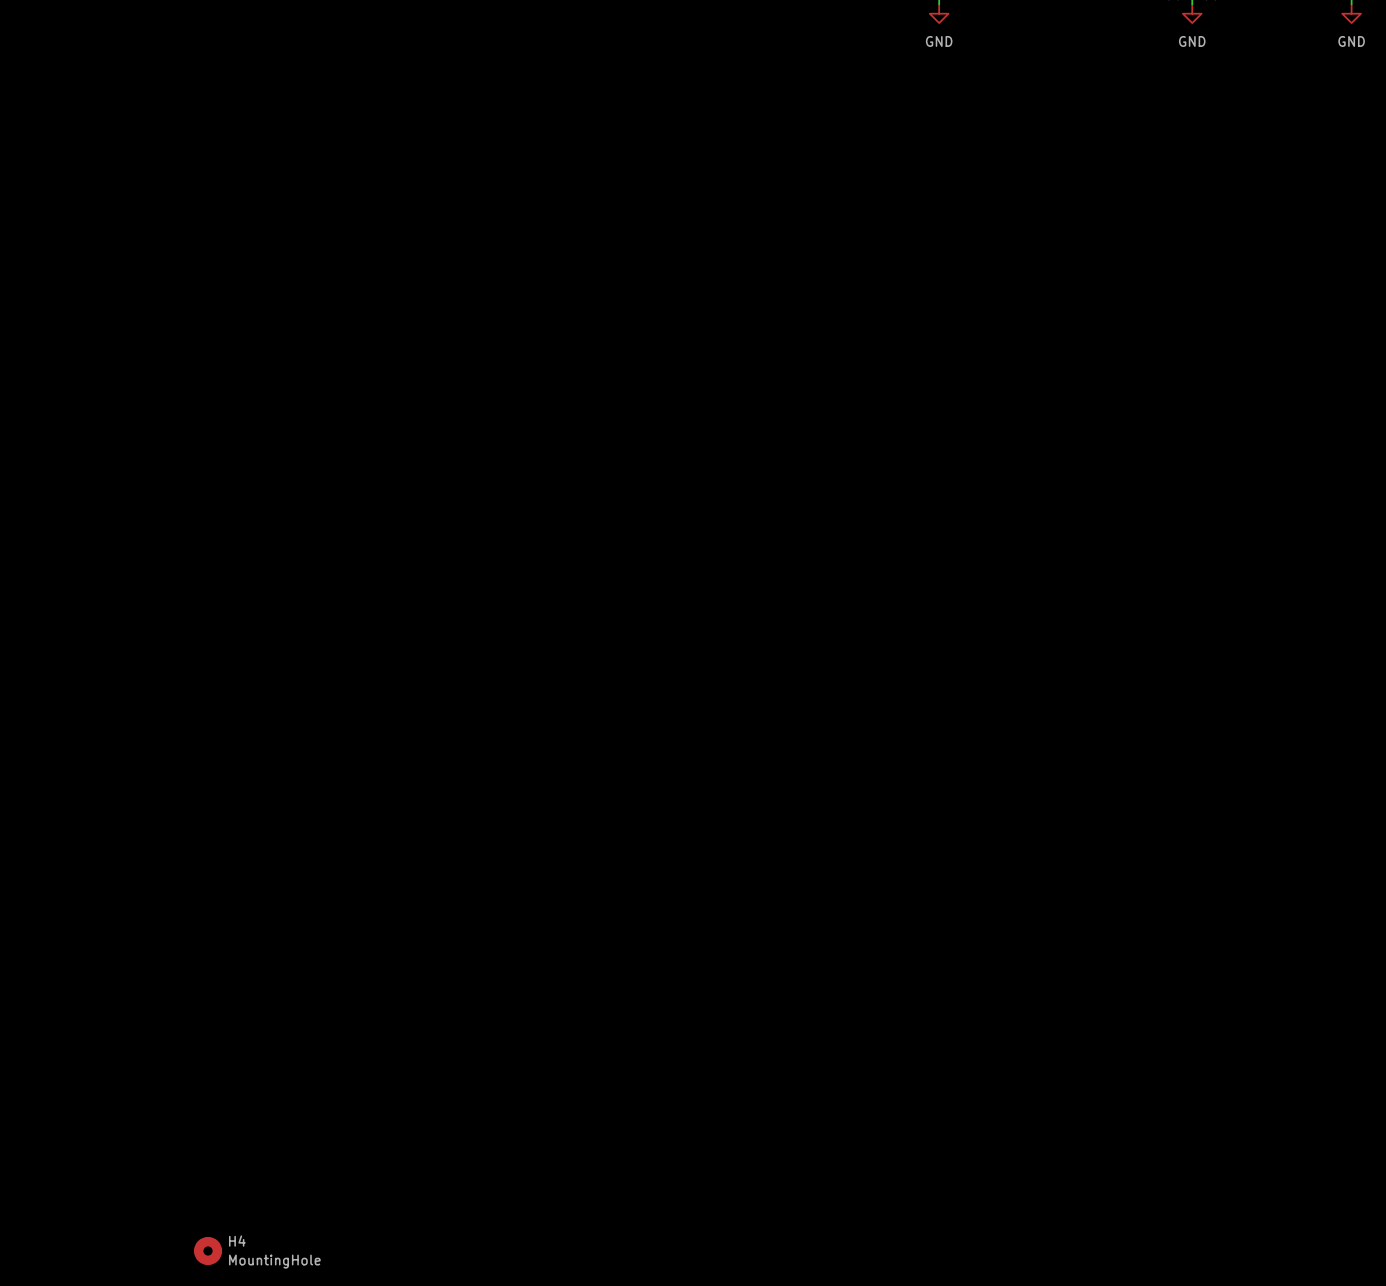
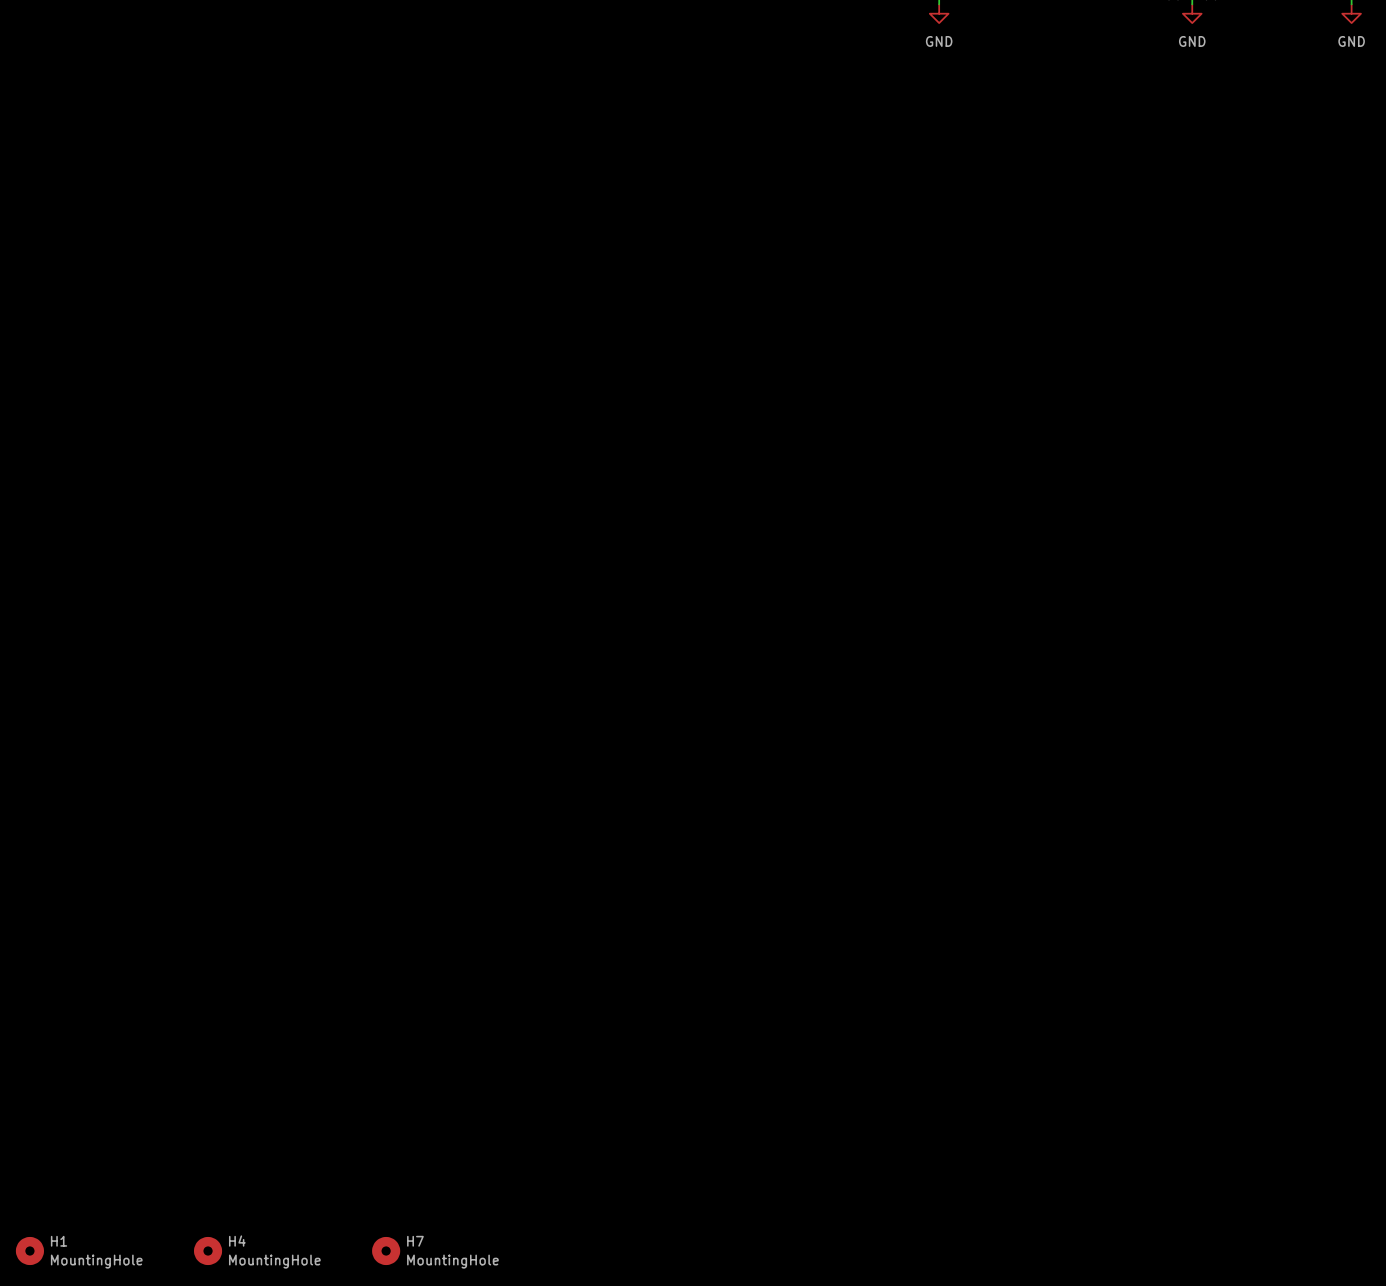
H1: none -> MountingHole (29, 1251)
H7: none -> MountingHole (386, 1251)

